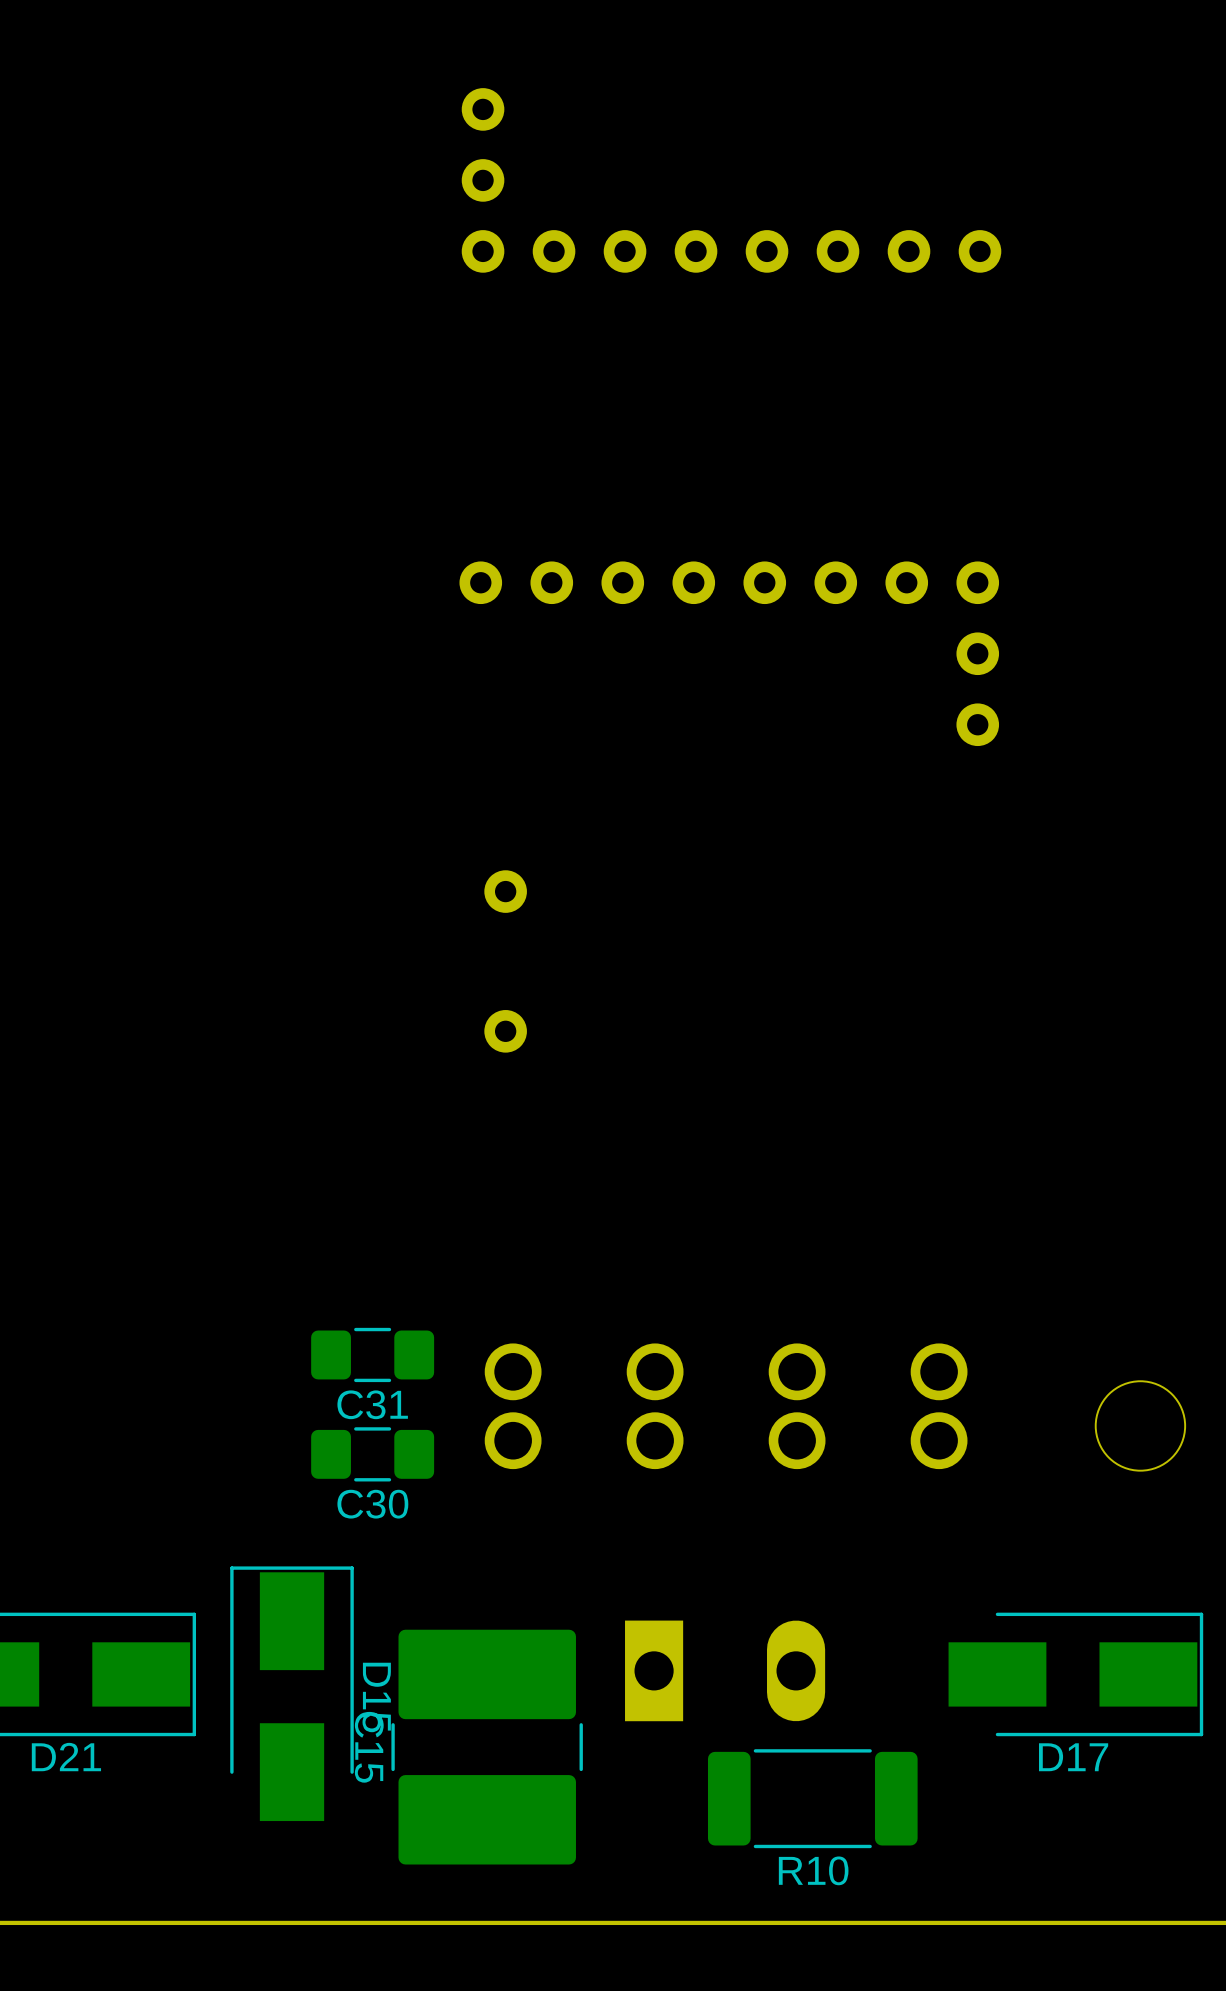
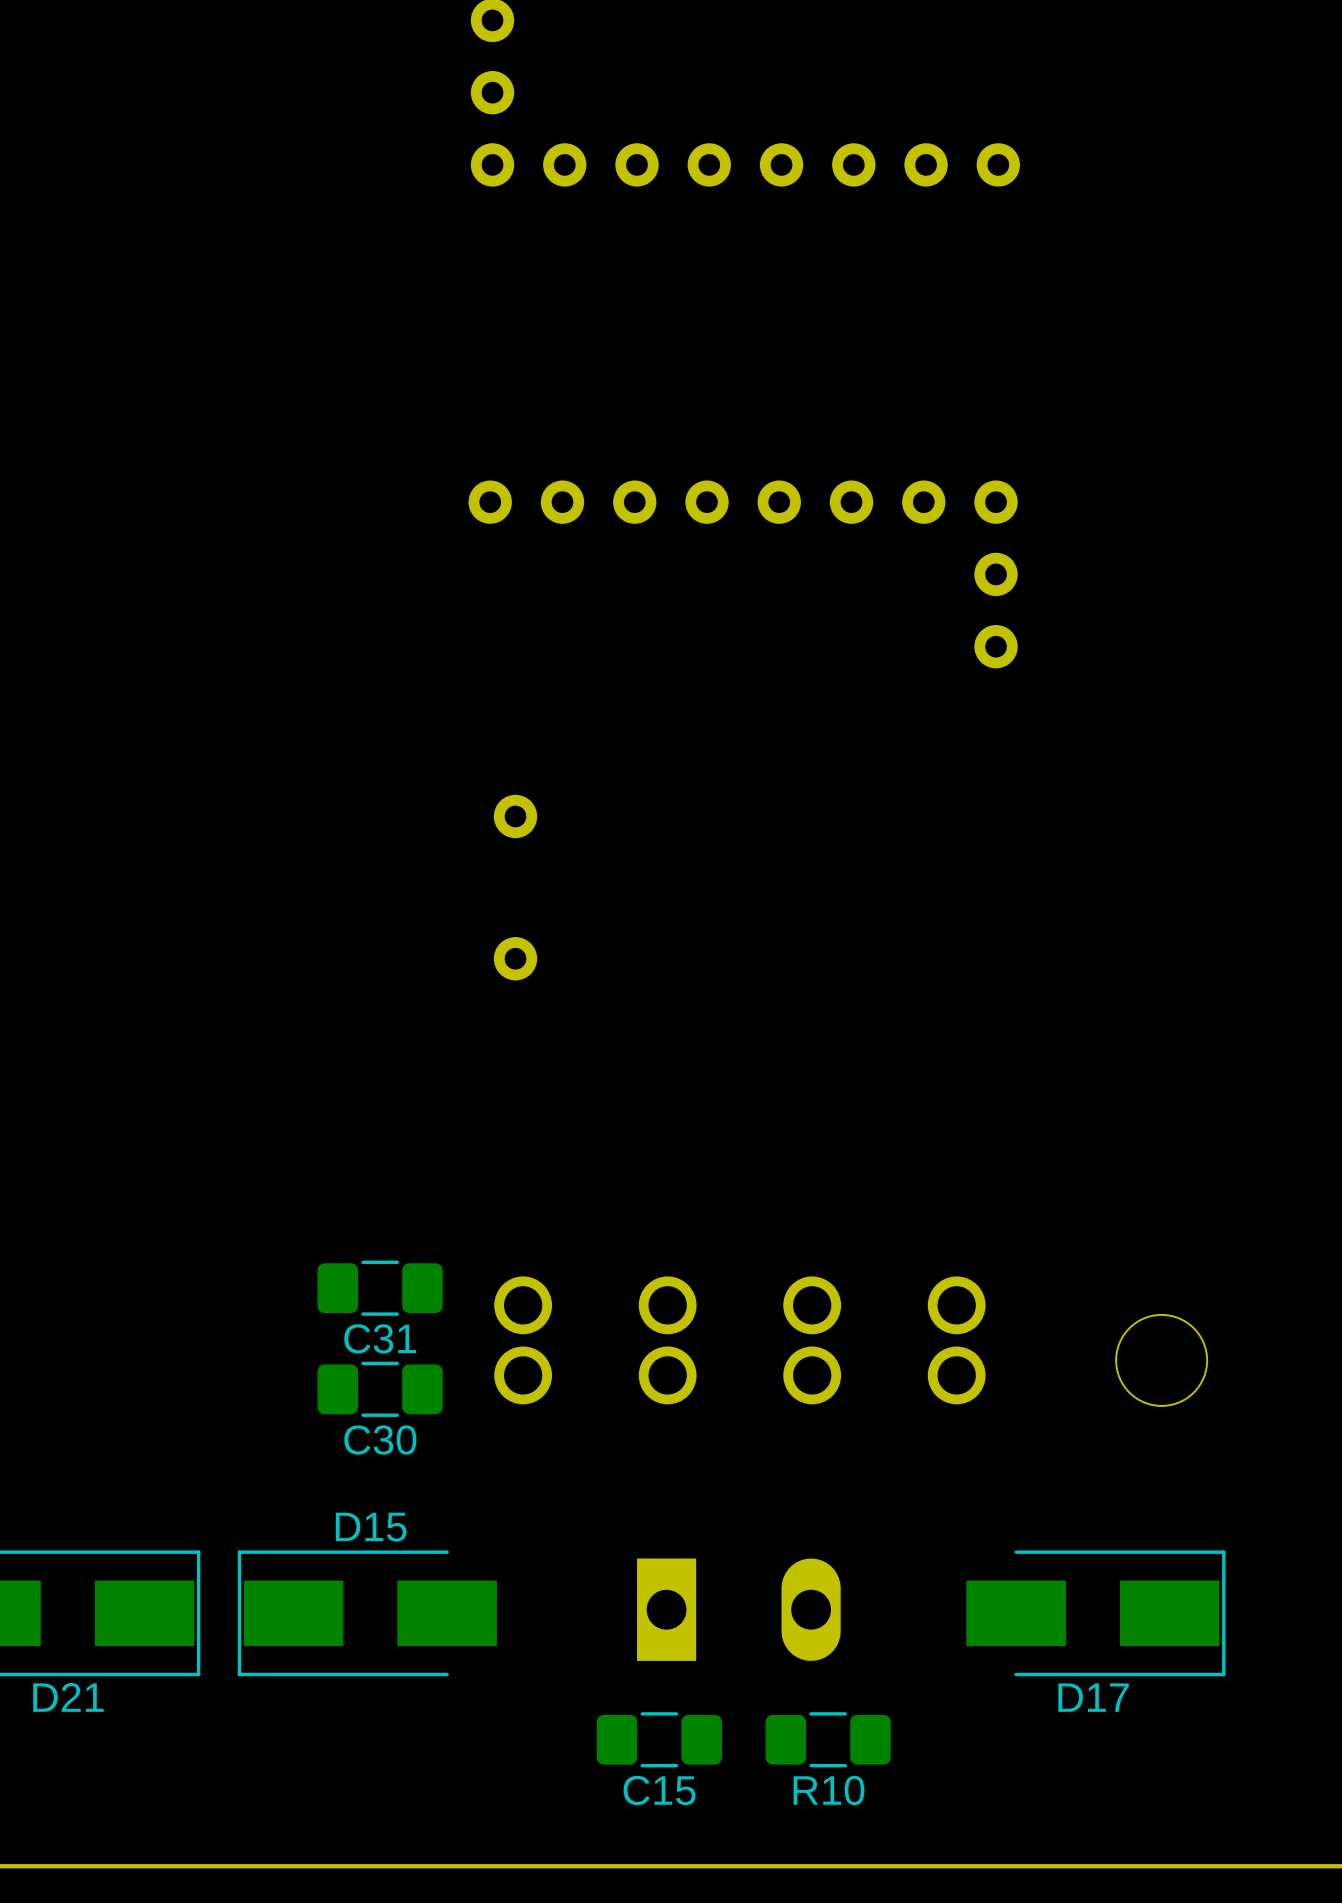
C15 footprint: [391, 1629, 583, 1865] -> [596, 1712, 722, 1768]
D15 rotation: 0° (292, 1693) -> 90° counterclockwise (367, 1613)
C15 name position: C15 (369, 1747) -> C15 (659, 1790)
R10 footprint: [707, 1749, 918, 1849] -> [765, 1712, 891, 1768]

